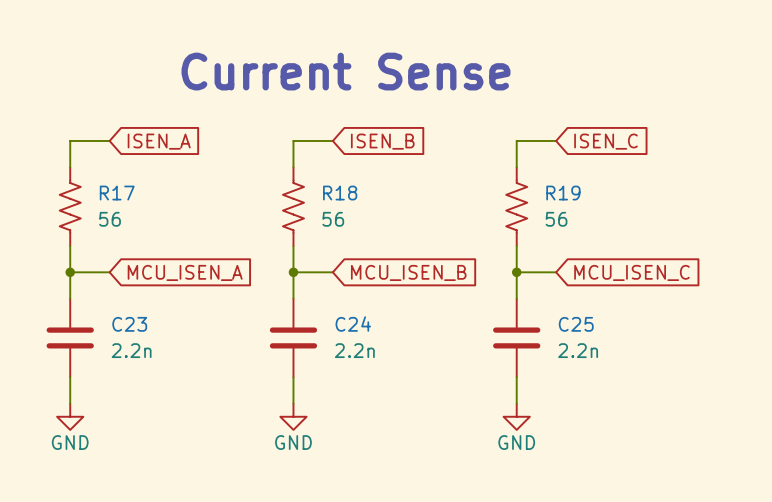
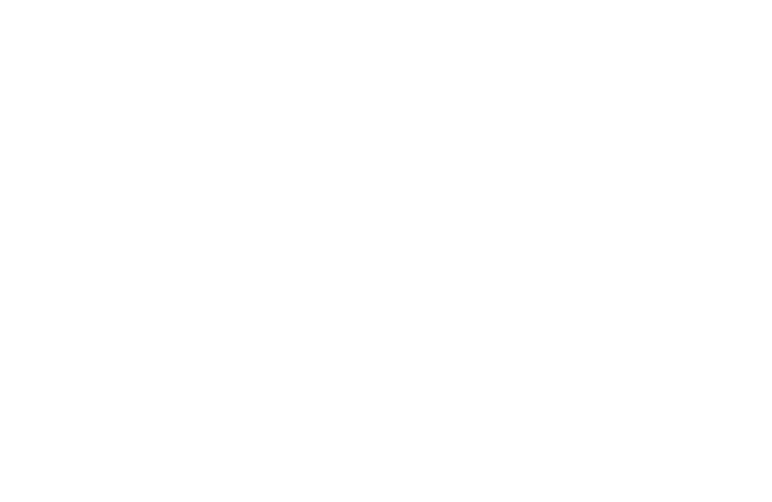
text: Current Sense (346, 71) -> none
wire: (109, 140) (70, 140) (70, 167) -> none
wire: (332, 140) (293, 140) (293, 167) -> none
wire: (556, 140) (516, 140) (516, 167) -> none
global label: ISEN_A (159, 141) -> none
global label: ISEN_B (382, 141) -> none
global label: ISEN_C (606, 141) -> none
R17: 56 (70, 206) -> none
R18: 56 (293, 206) -> none
R19: 56 (516, 206) -> none
wire: (70, 246) (70, 298) -> none
wire: (293, 246) (293, 298) -> none
wire: (516, 246) (516, 298) -> none
wire: (70, 272) (109, 272) -> none
junction: (70, 272) -> none
global label: MCU_ISEN_A (185, 272) -> none
wire: (293, 272) (332, 272) -> none
junction: (293, 272) -> none
global label: MCU_ISEN_B (408, 272) -> none
wire: (516, 272) (556, 272) -> none
junction: (516, 272) -> none
global label: MCU_ISEN_C (631, 272) -> none
C23: 2.2n (70, 337) -> none
C24: 2.2n (293, 337) -> none
C25: 2.2n (516, 337) -> none
wire: (70, 377) (70, 403) -> none
wire: (293, 377) (293, 403) -> none
wire: (516, 377) (516, 403) -> none
power symbol: GND (70, 416) -> none
power symbol: GND (293, 416) -> none
power symbol: GND (516, 416) -> none

